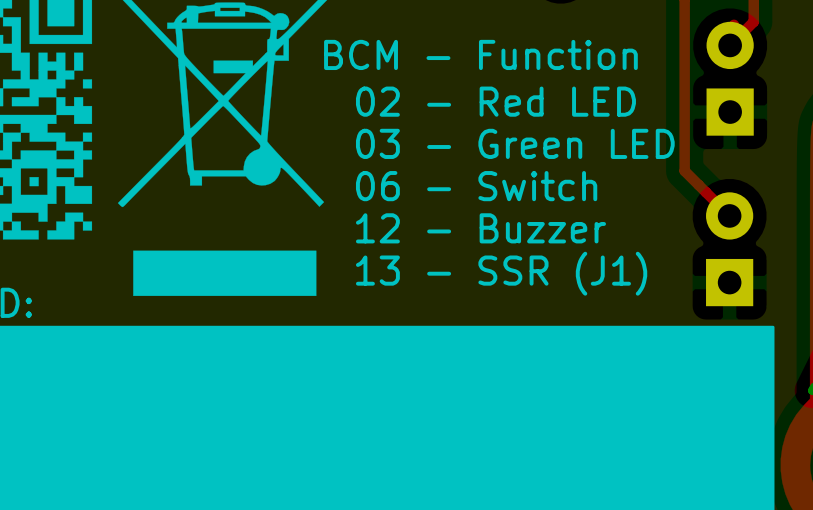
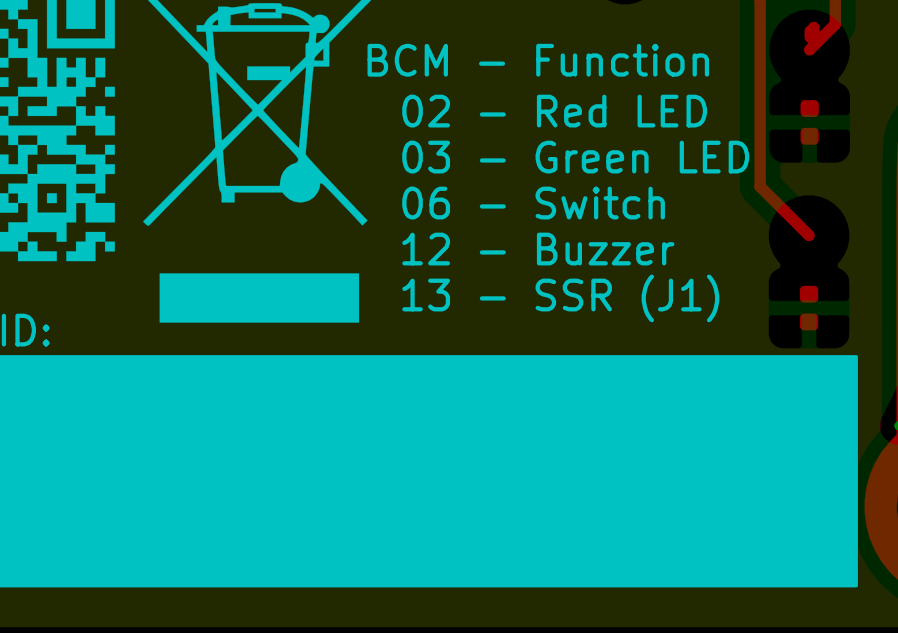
part: (730, 78) -> none
part: none -> (809, 122)
part: (729, 249) -> none
part: none -> (809, 308)

